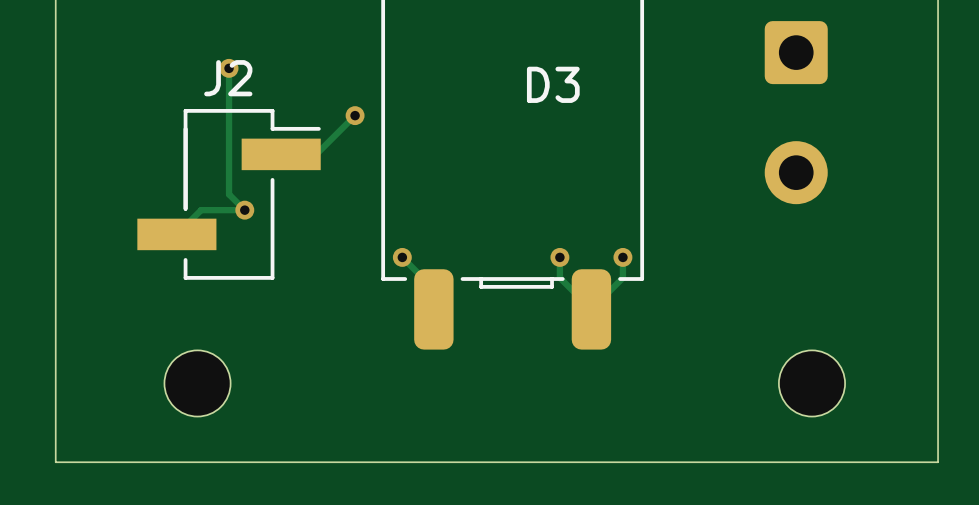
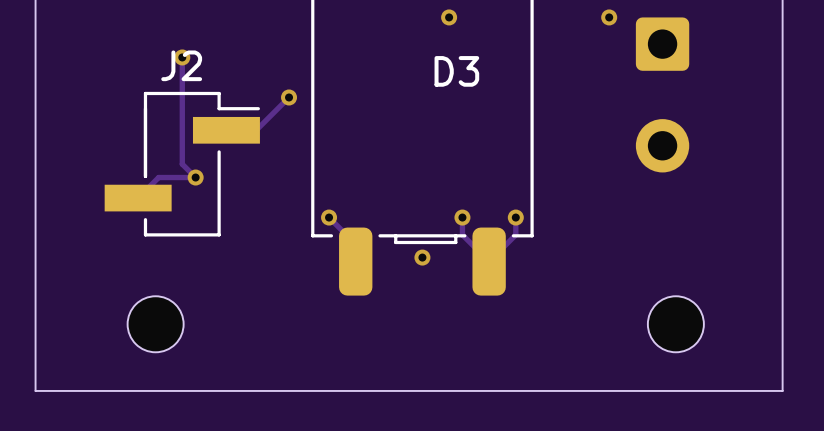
via: none -> (449, 17)
via: none -> (609, 17)
via: none -> (422, 257)

